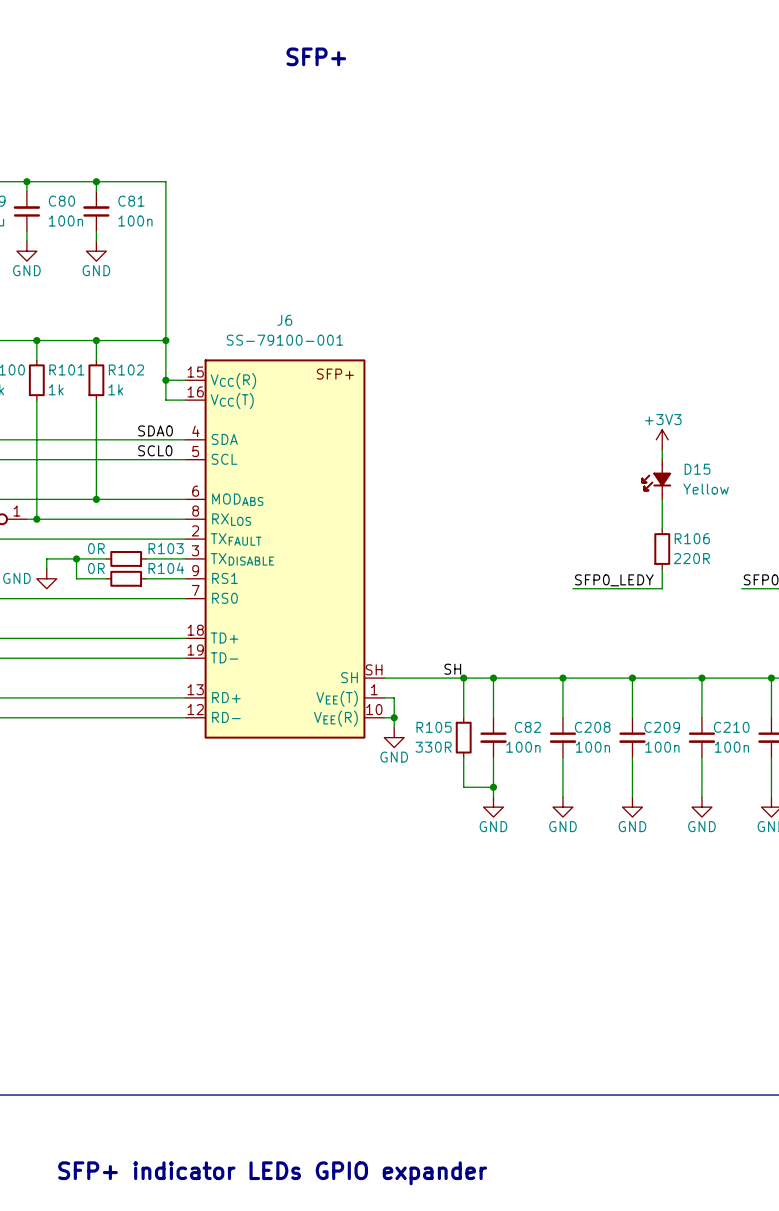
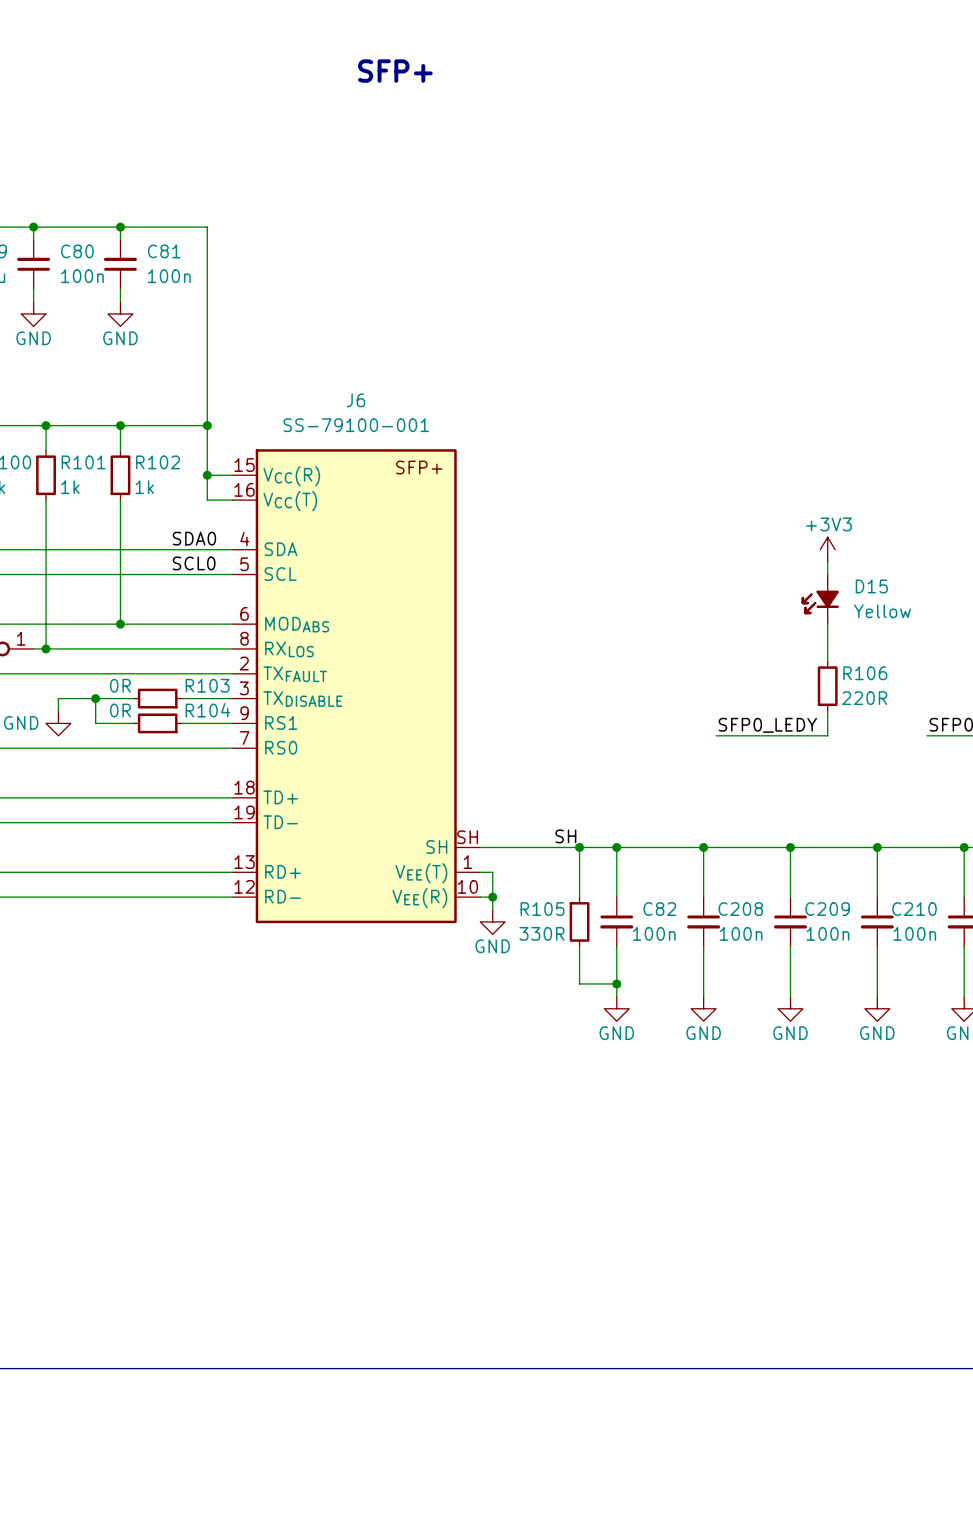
text: SFP+ indicator LEDs GPIO expander (272, 1173) -> none

